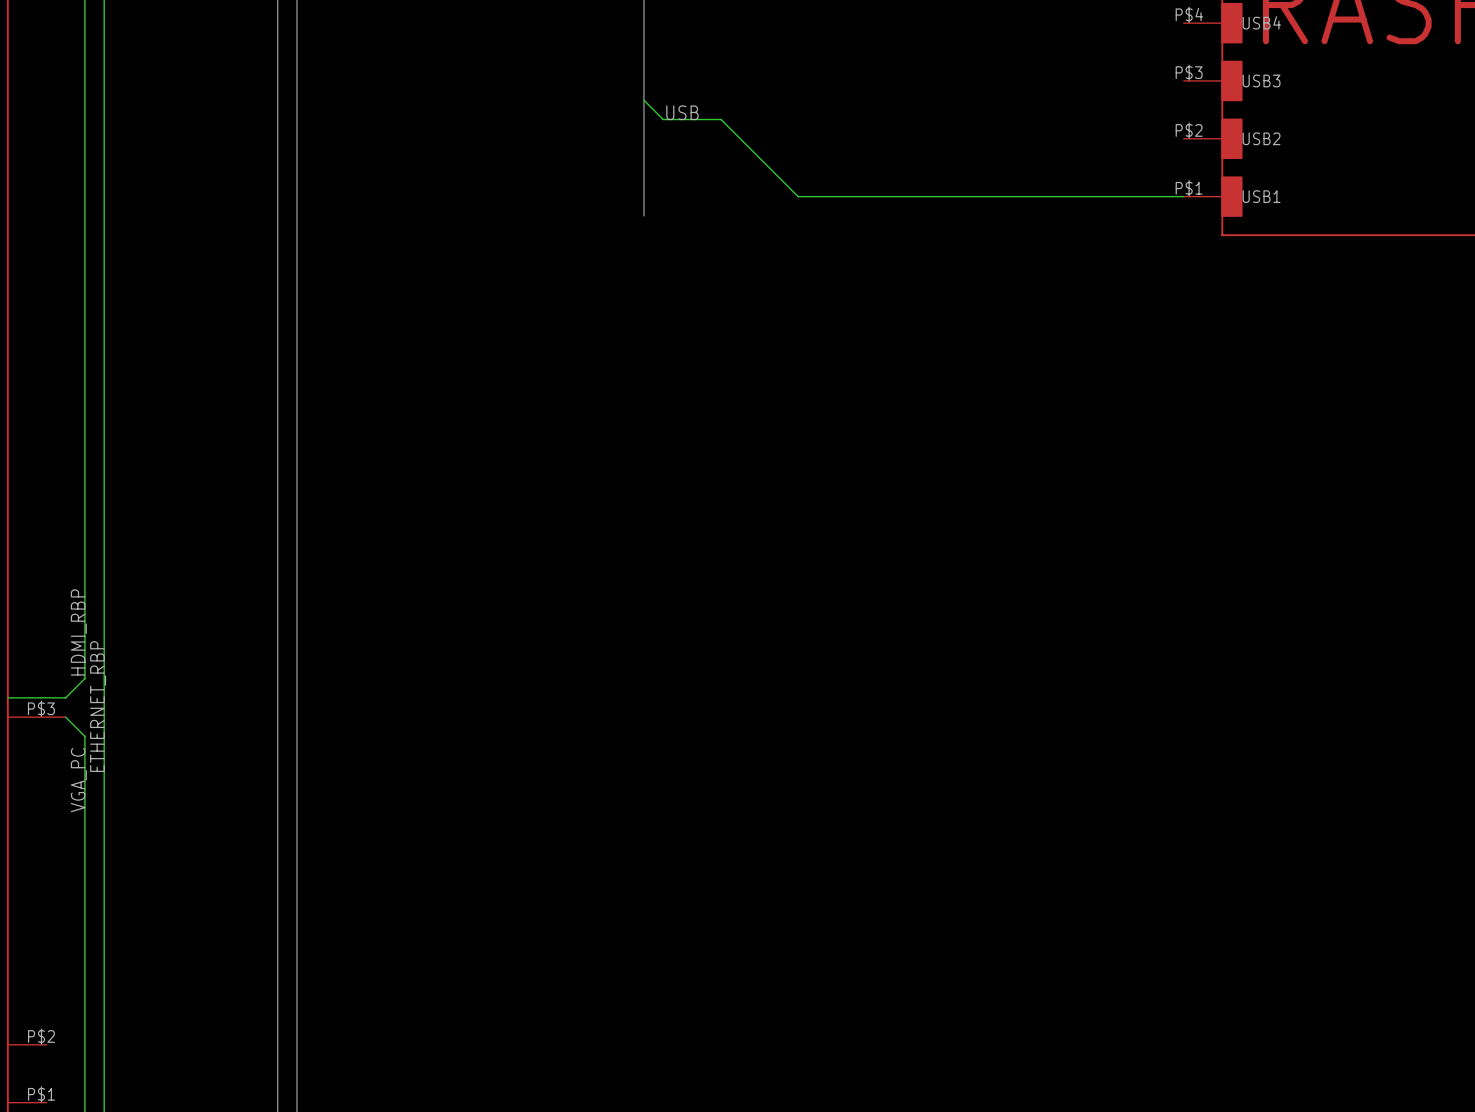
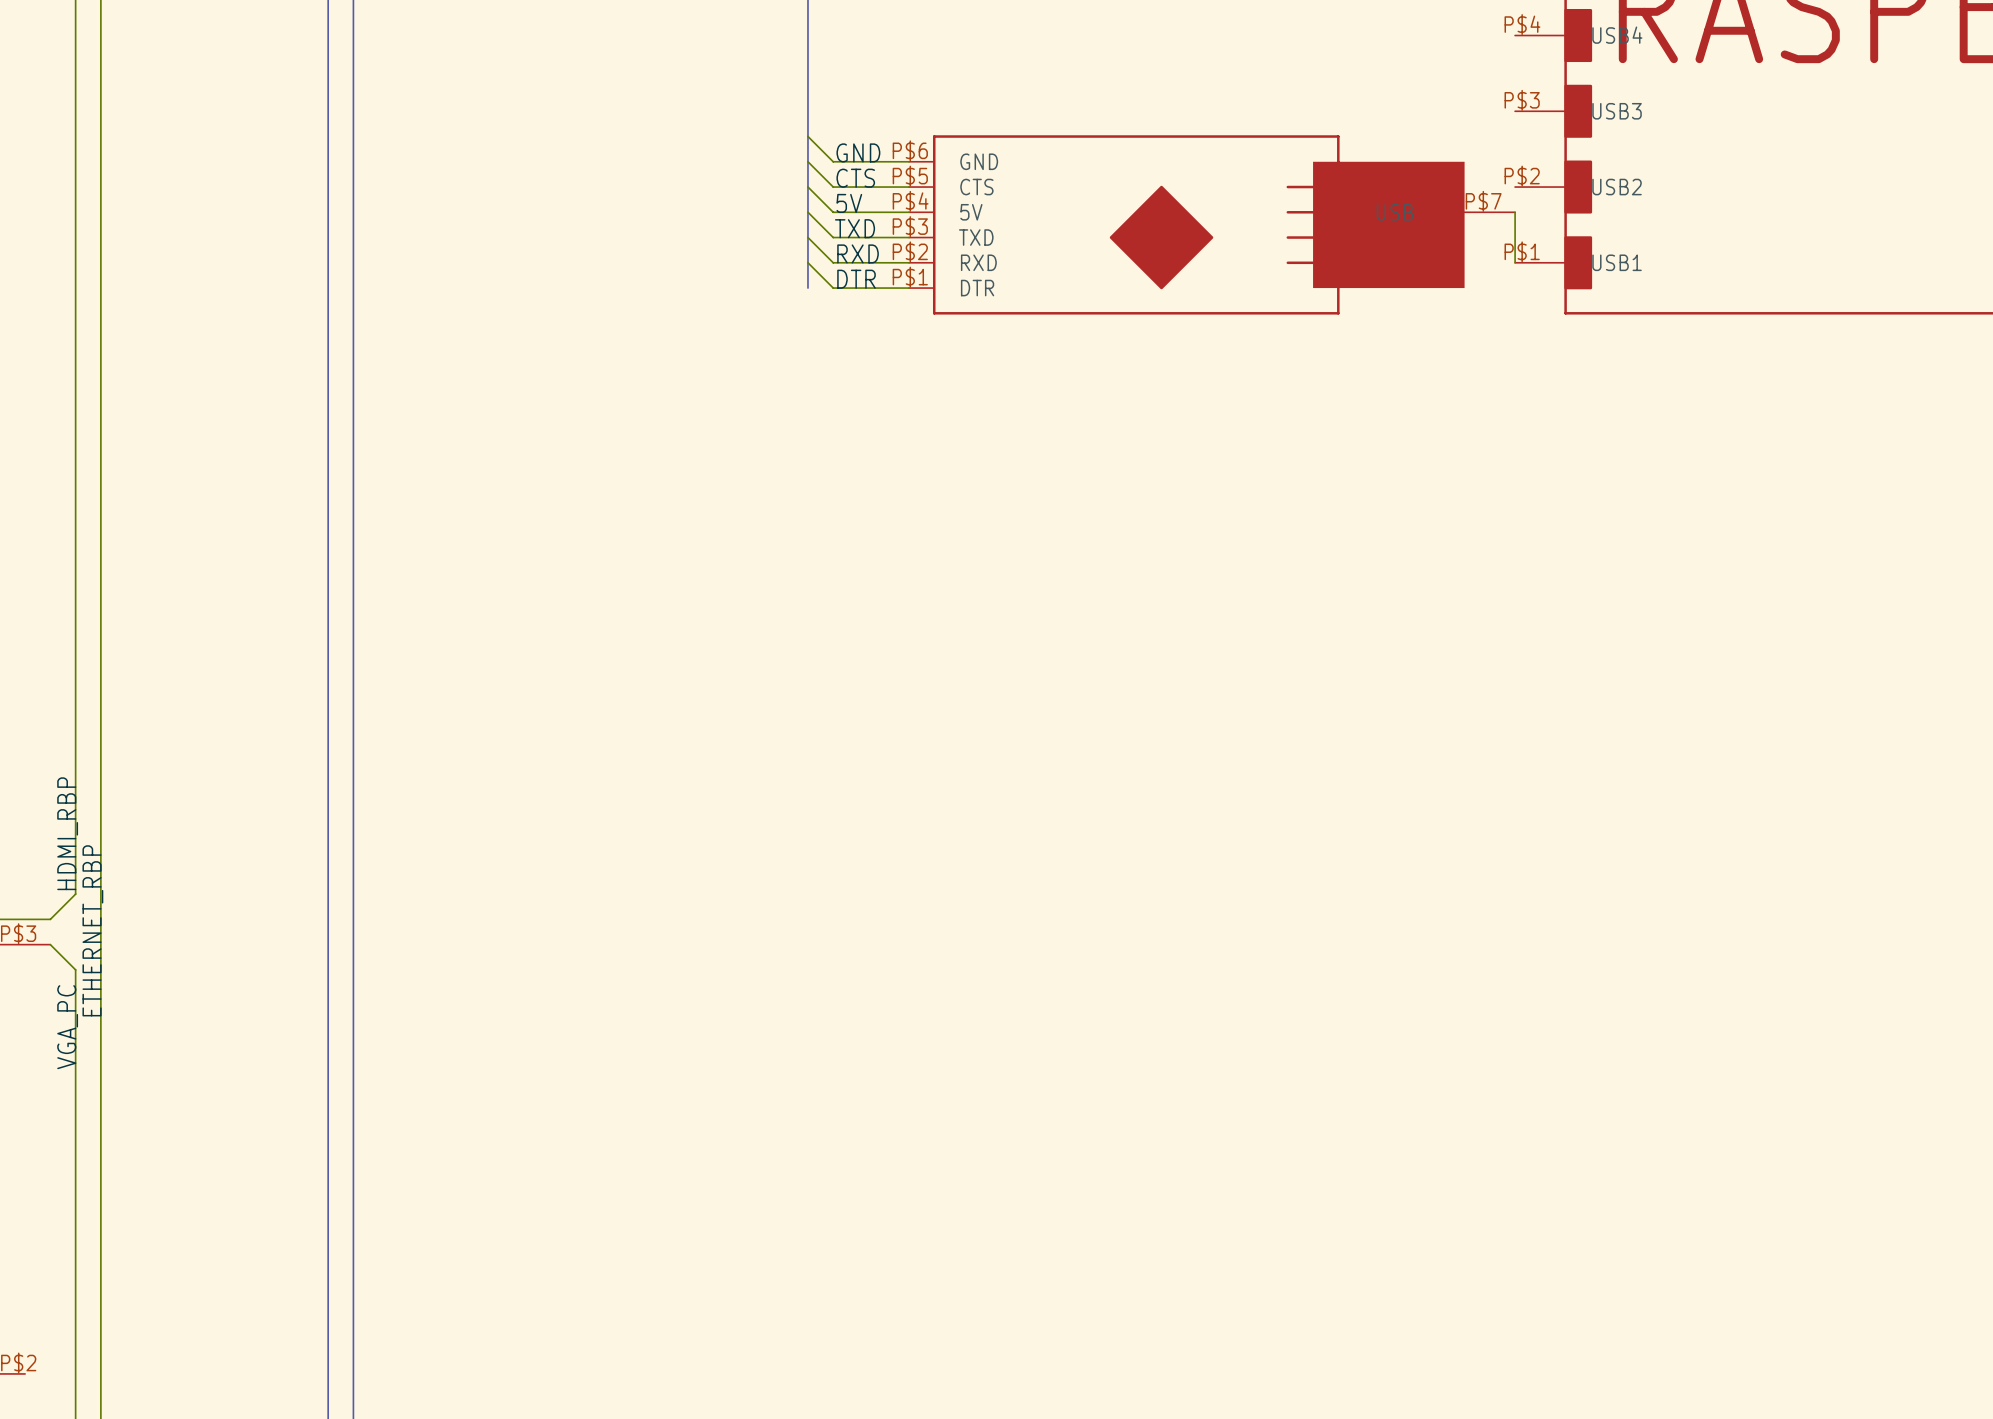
label: USB (682, 112) -> GND (858, 152)
wire: none -> (807, 161) (833, 187) (908, 187)
wire: (721, 119) (798, 196) (1183, 196) -> (1515, 212) (1515, 262)
label: none -> CTS (855, 178)
wire: none -> (807, 187) (833, 212) (908, 212)
label: none -> 5V (849, 203)
wire: none -> (807, 212) (833, 237) (908, 237)
part: none -> (1212, 224)
label: none -> TXD (855, 228)
wire: none -> (807, 237) (833, 262) (908, 262)
label: none -> RXD (858, 253)
wire: none -> (807, 262) (833, 288) (908, 288)
label: none -> DTR (856, 279)

